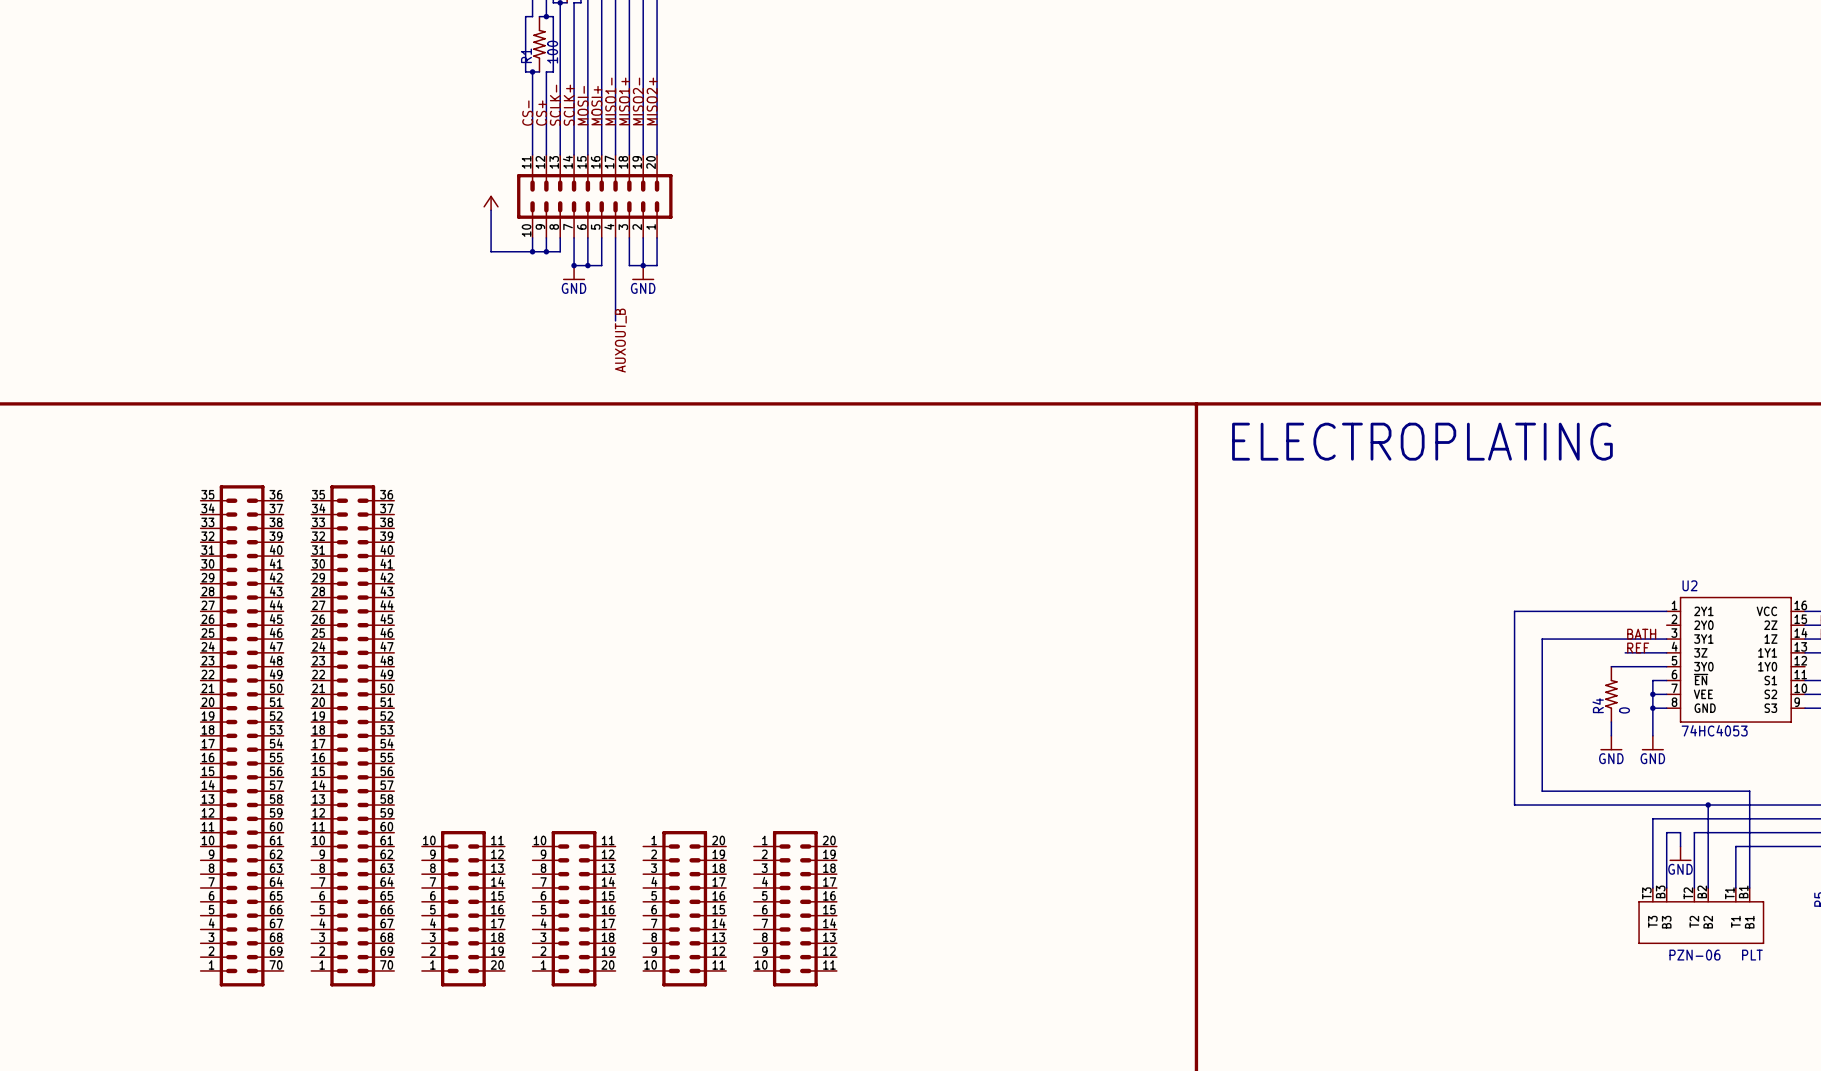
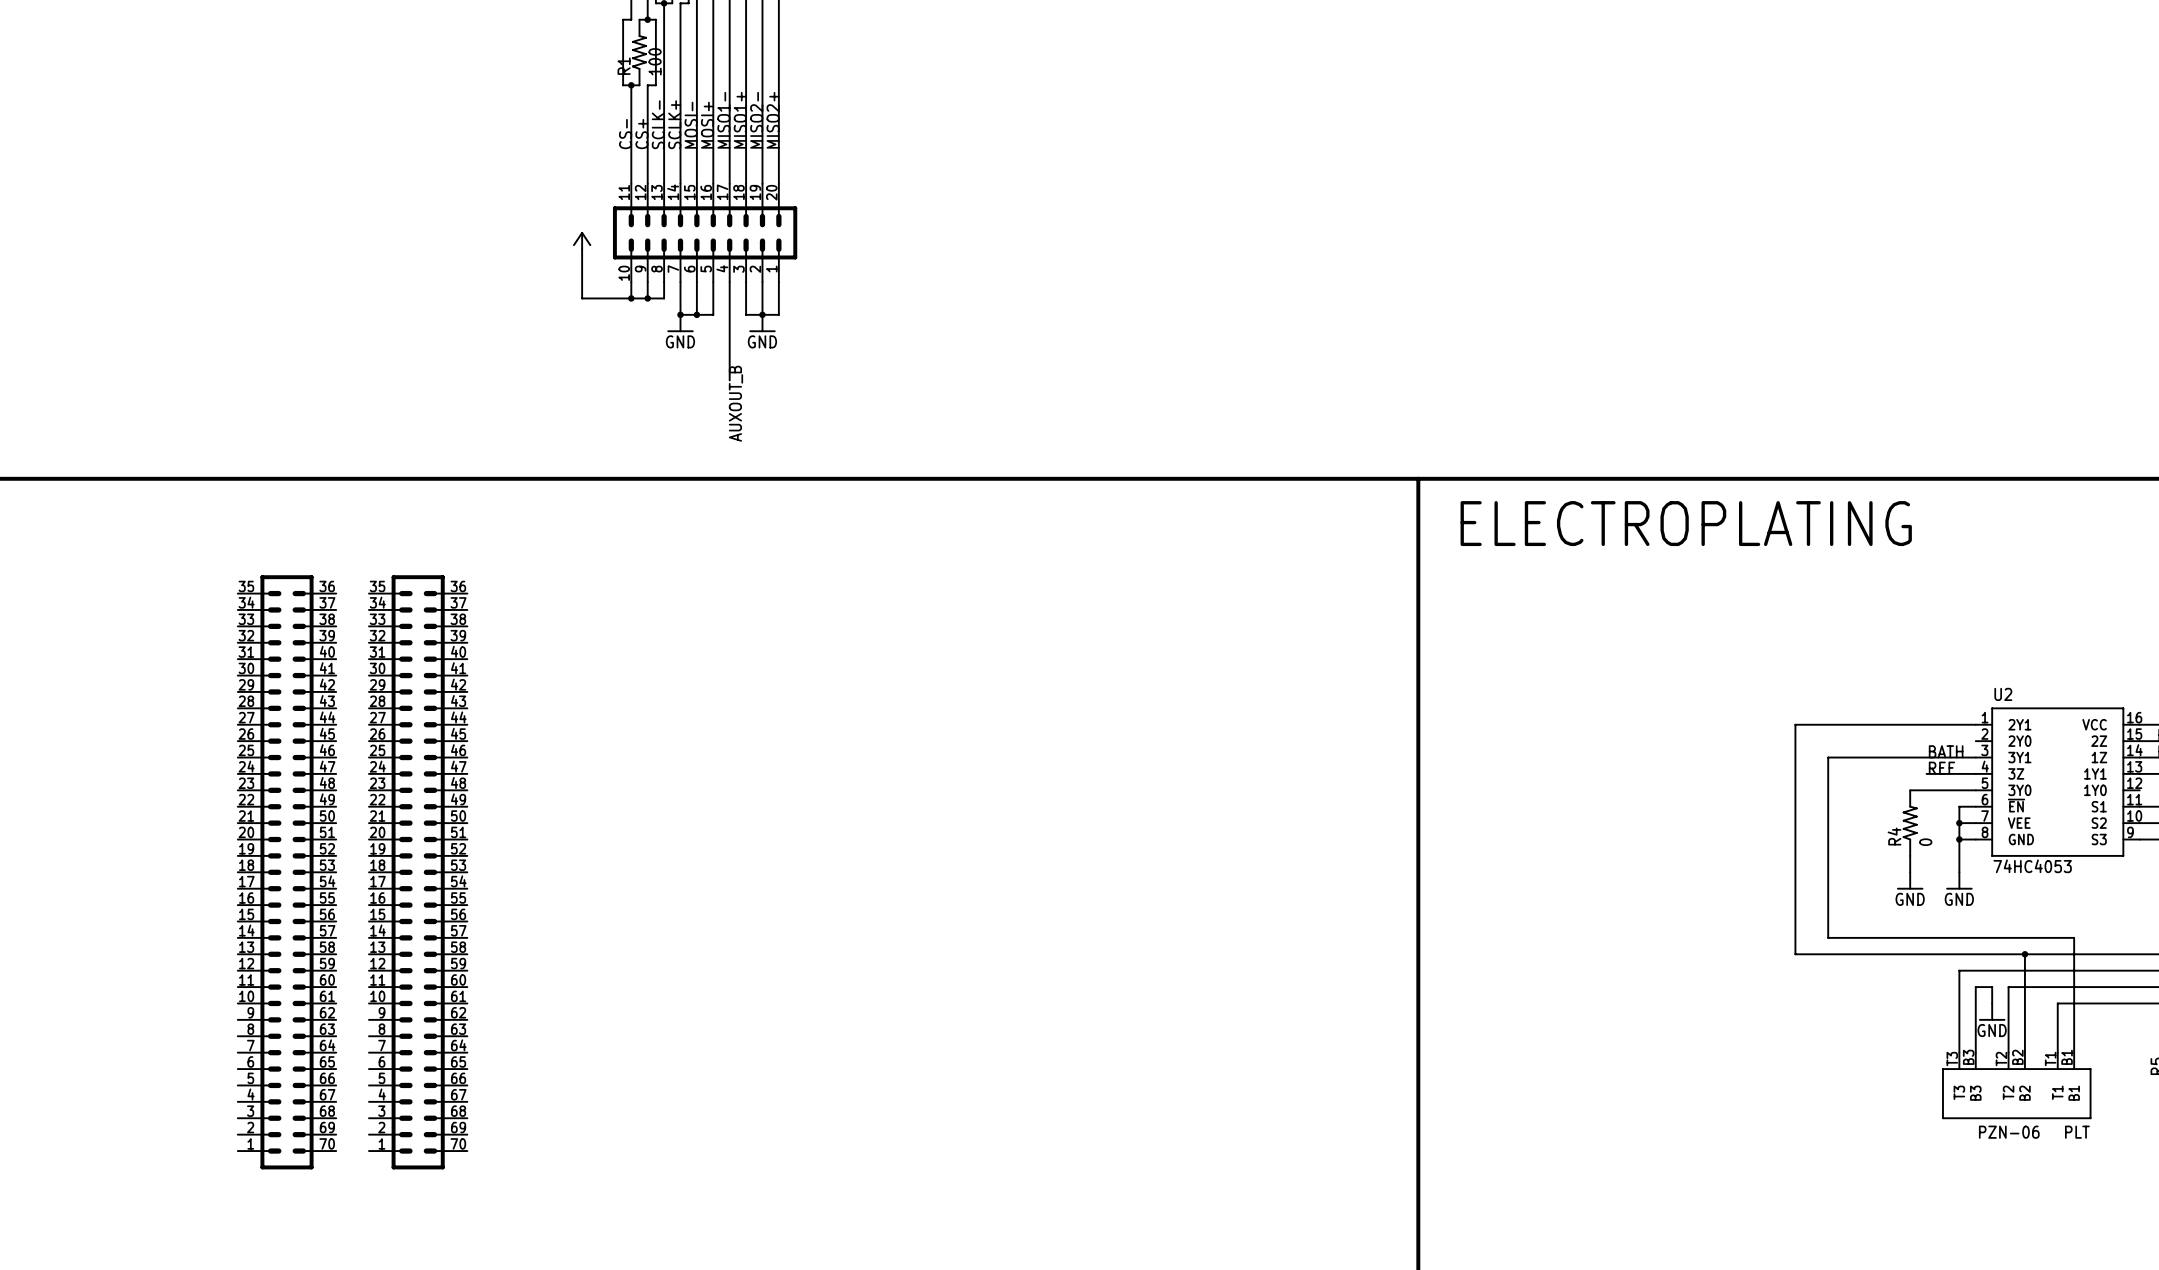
part: (463, 908) -> none
part: (574, 908) -> none
part: (684, 908) -> none
part: (795, 908) -> none

